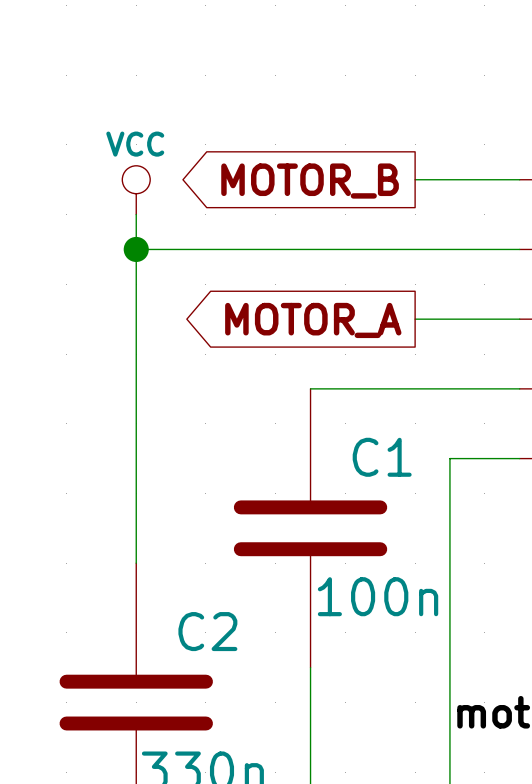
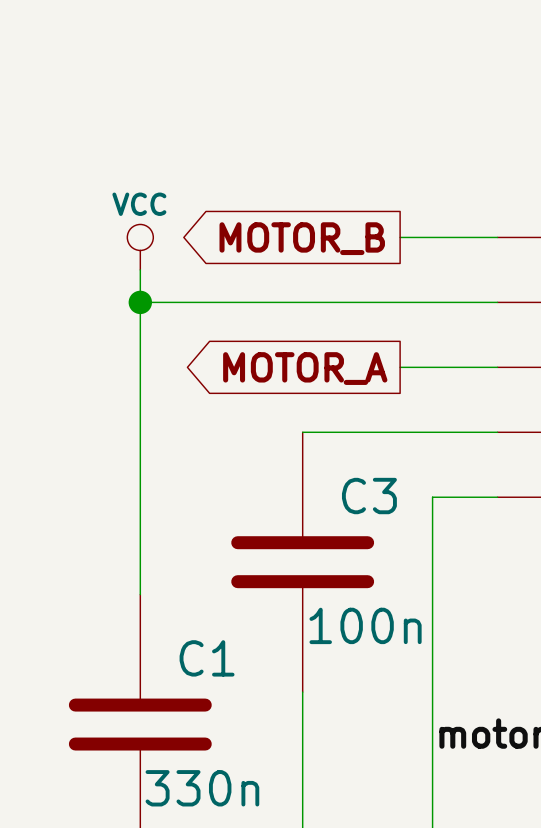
C1 name: C1 (382, 457) -> C3 (369, 496)
C2 name: C2 (207, 631) -> C1 (207, 658)

